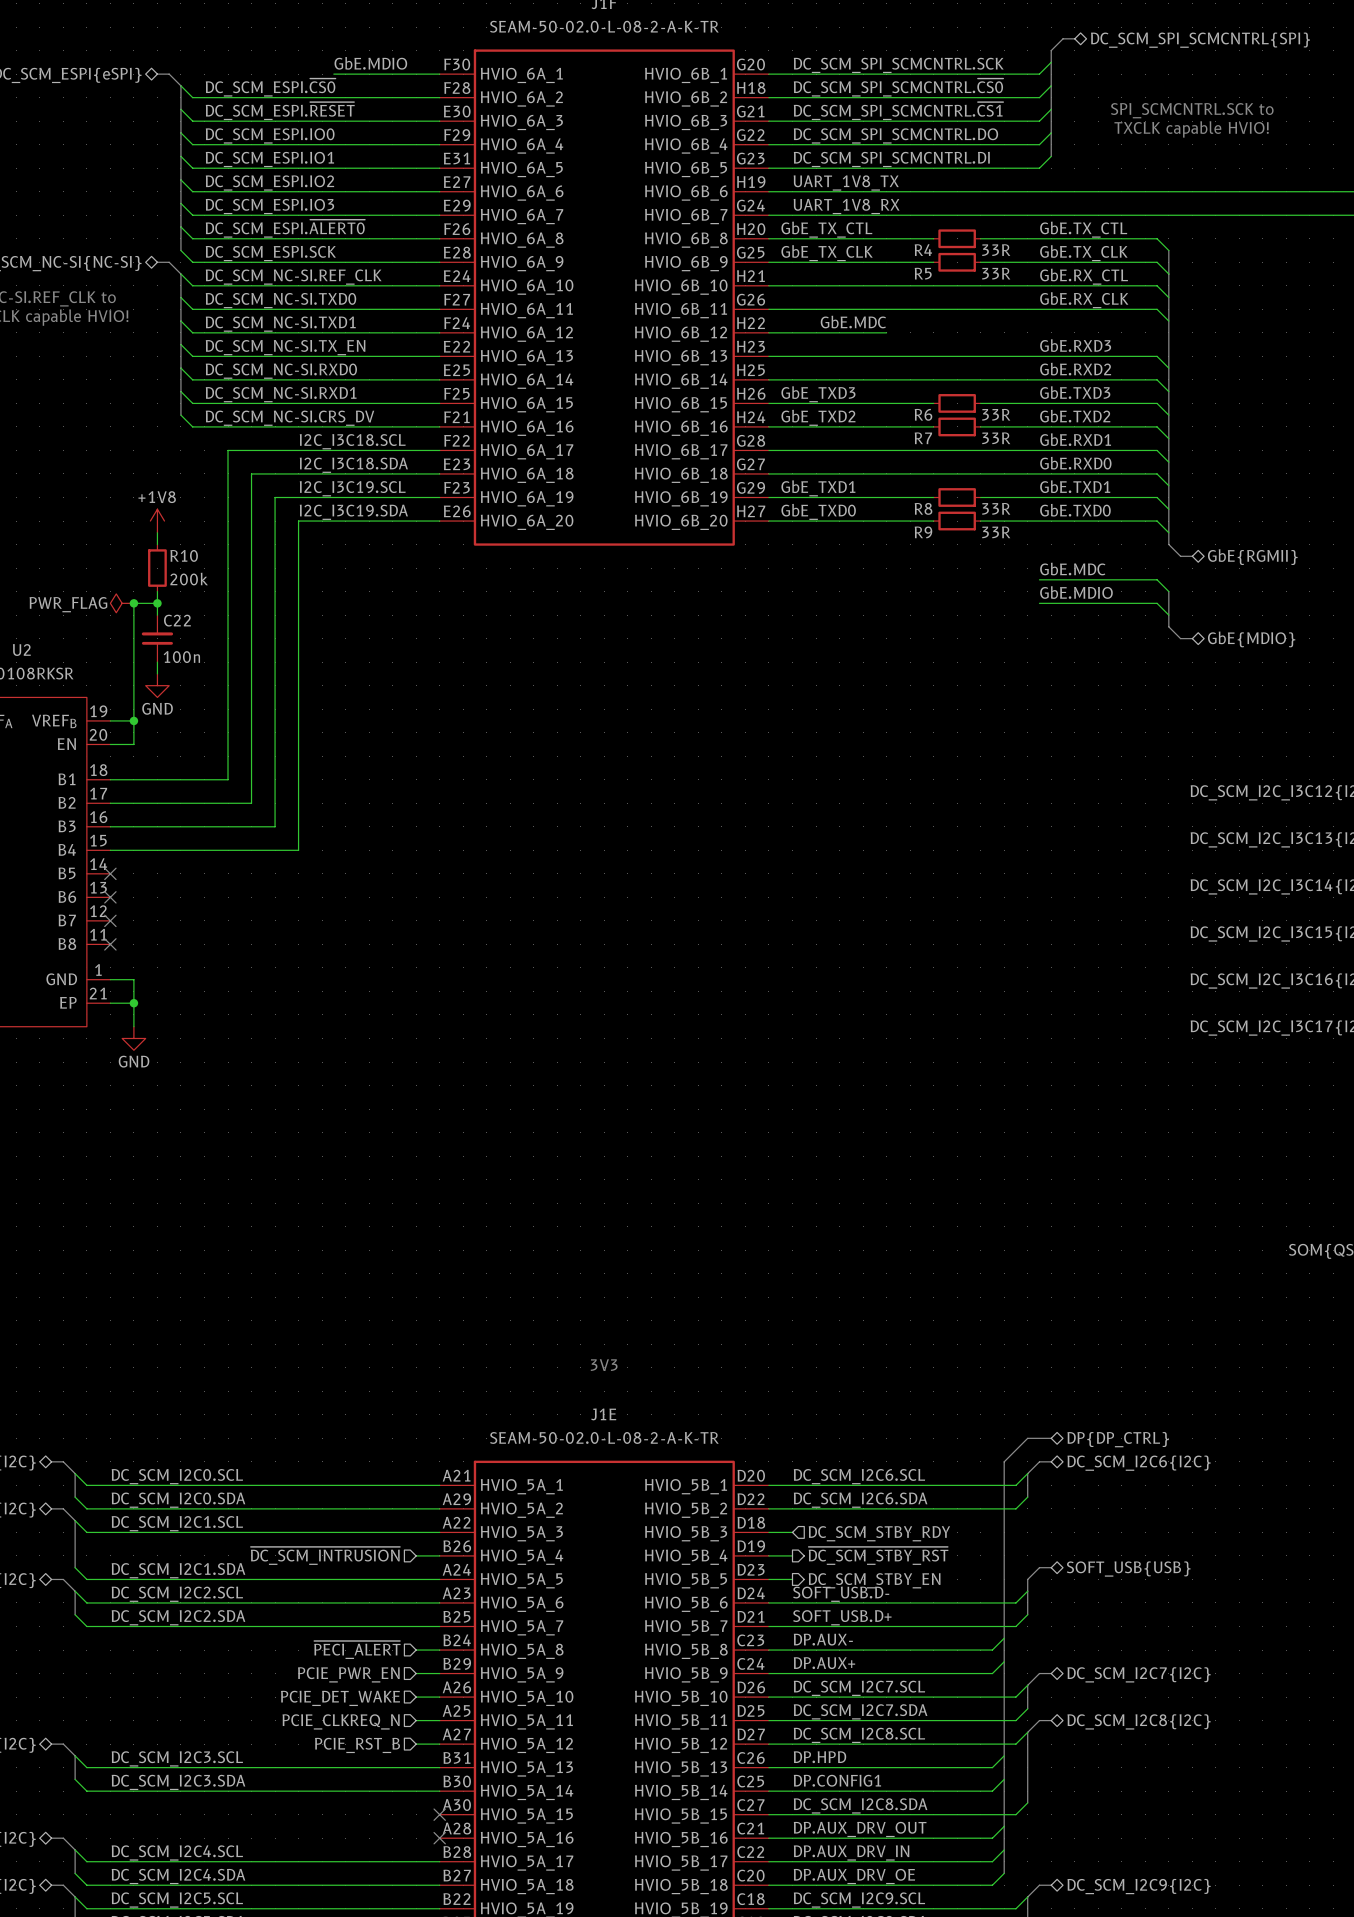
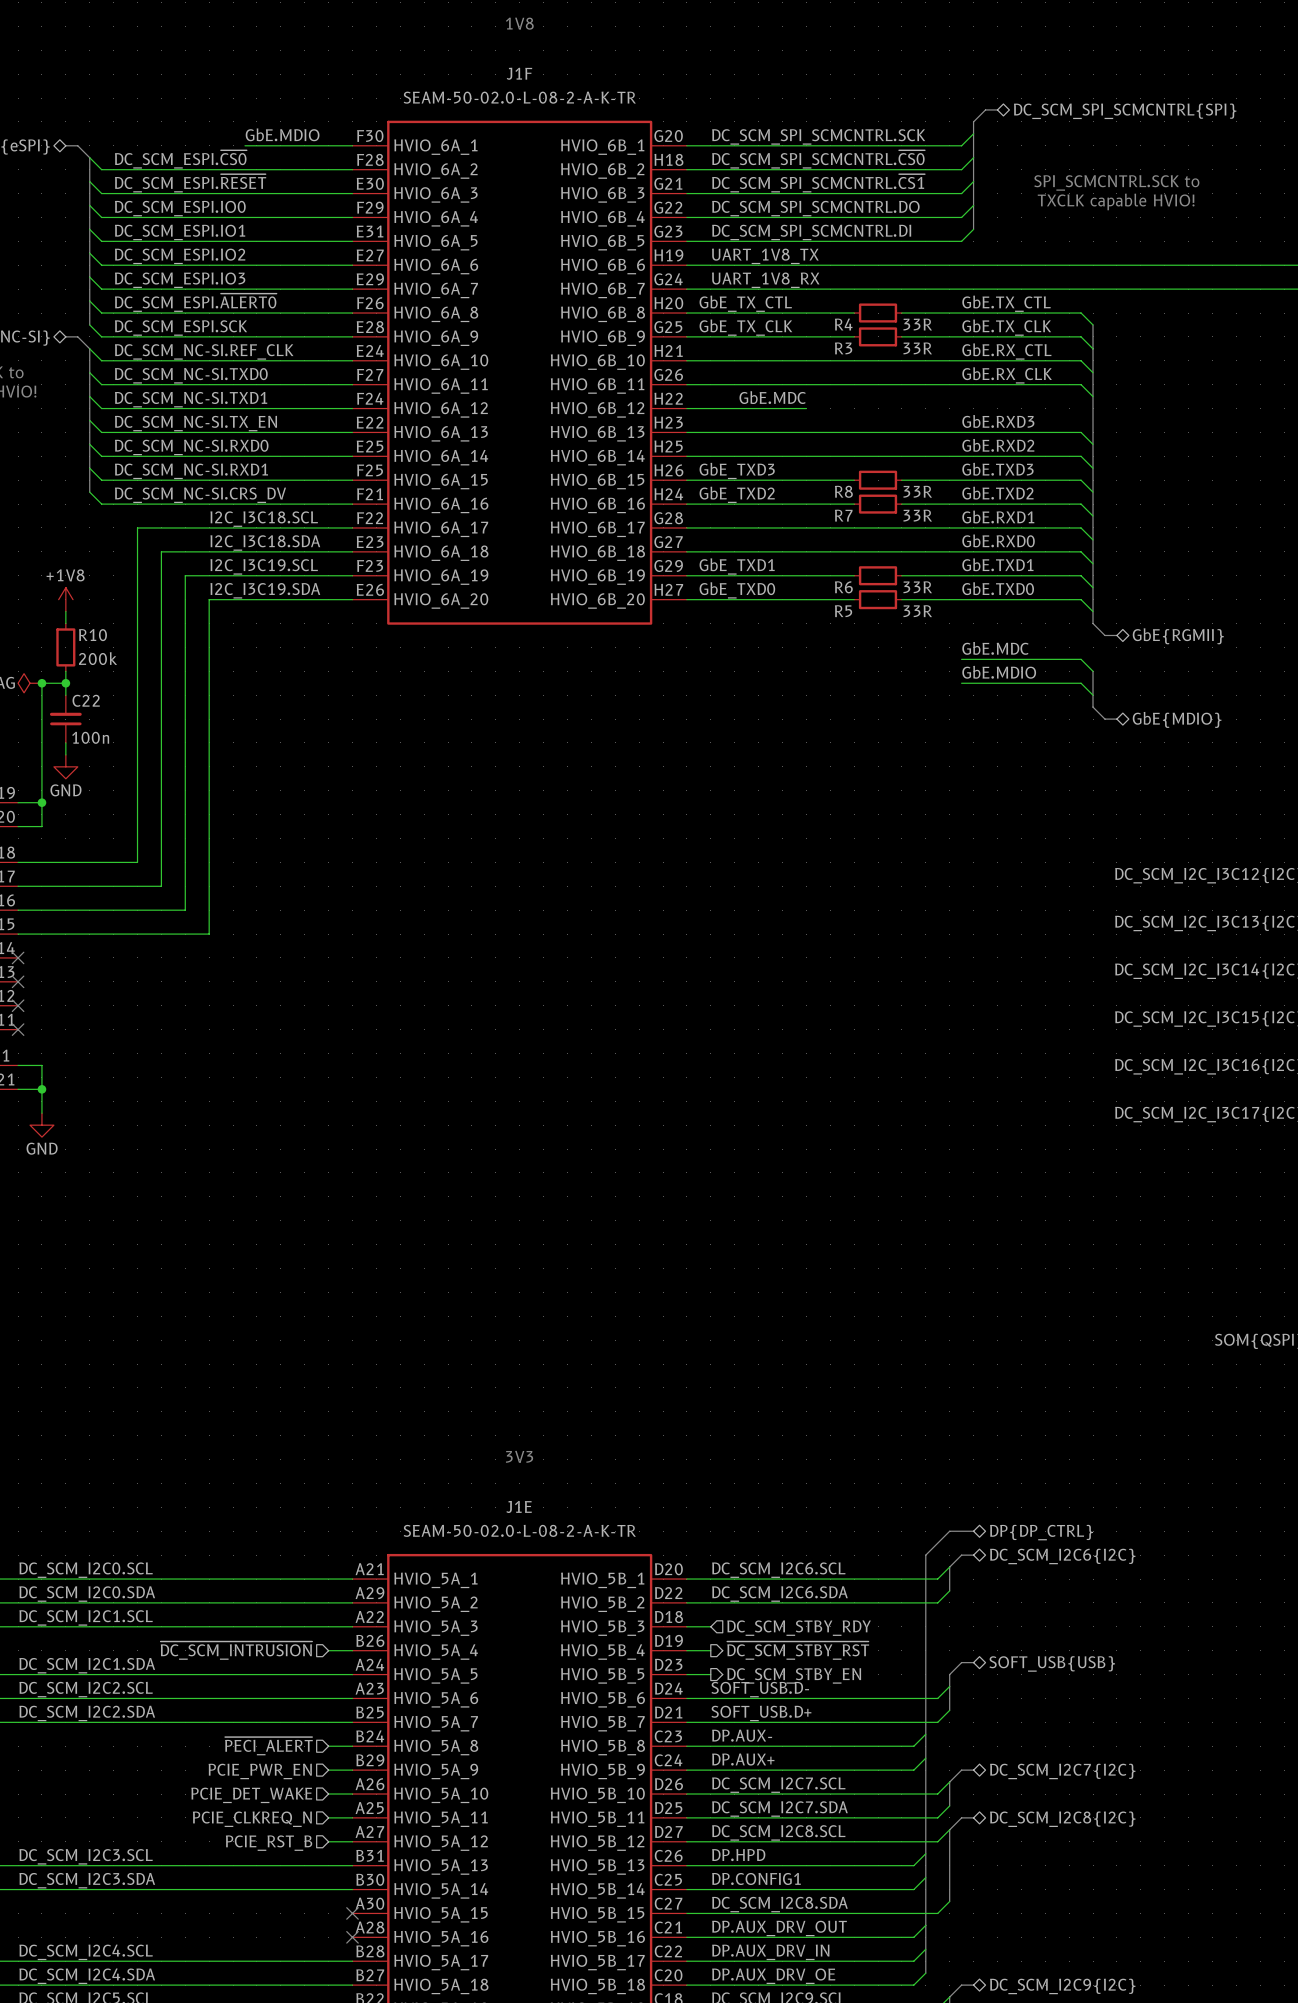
R5 name: R5 (923, 273) -> R3 (843, 348)
R6 name: R6 (923, 414) -> R8 (843, 491)
R8 name: R8 (923, 508) -> R6 (843, 587)
R9 name: R9 (923, 532) -> R5 (843, 611)

